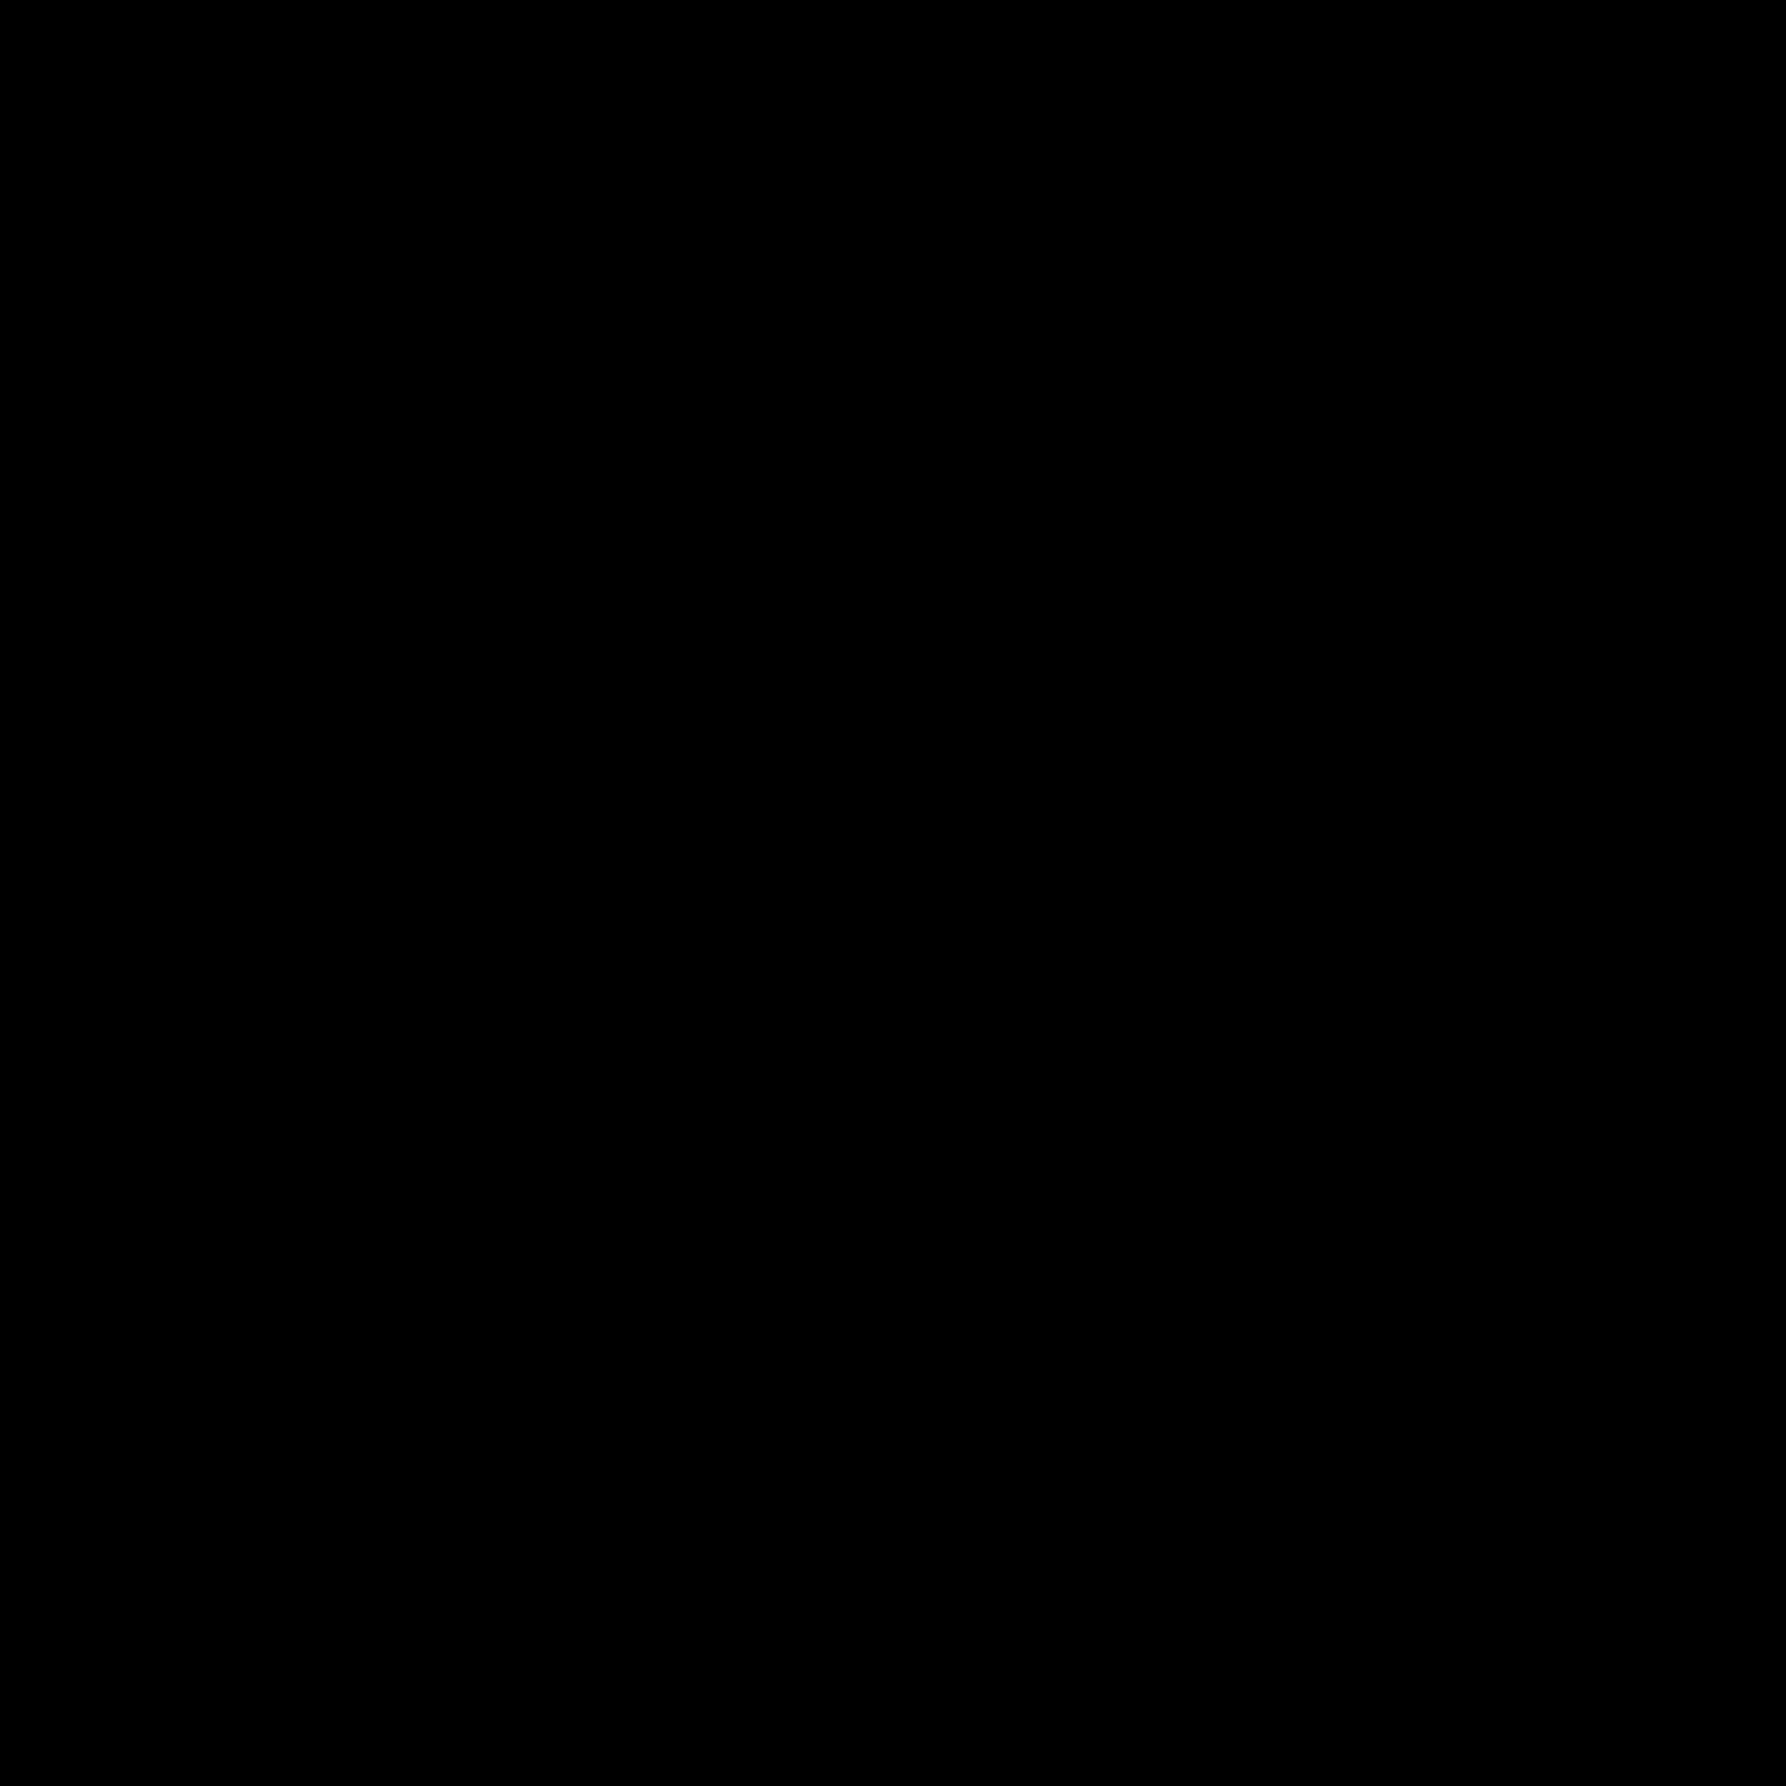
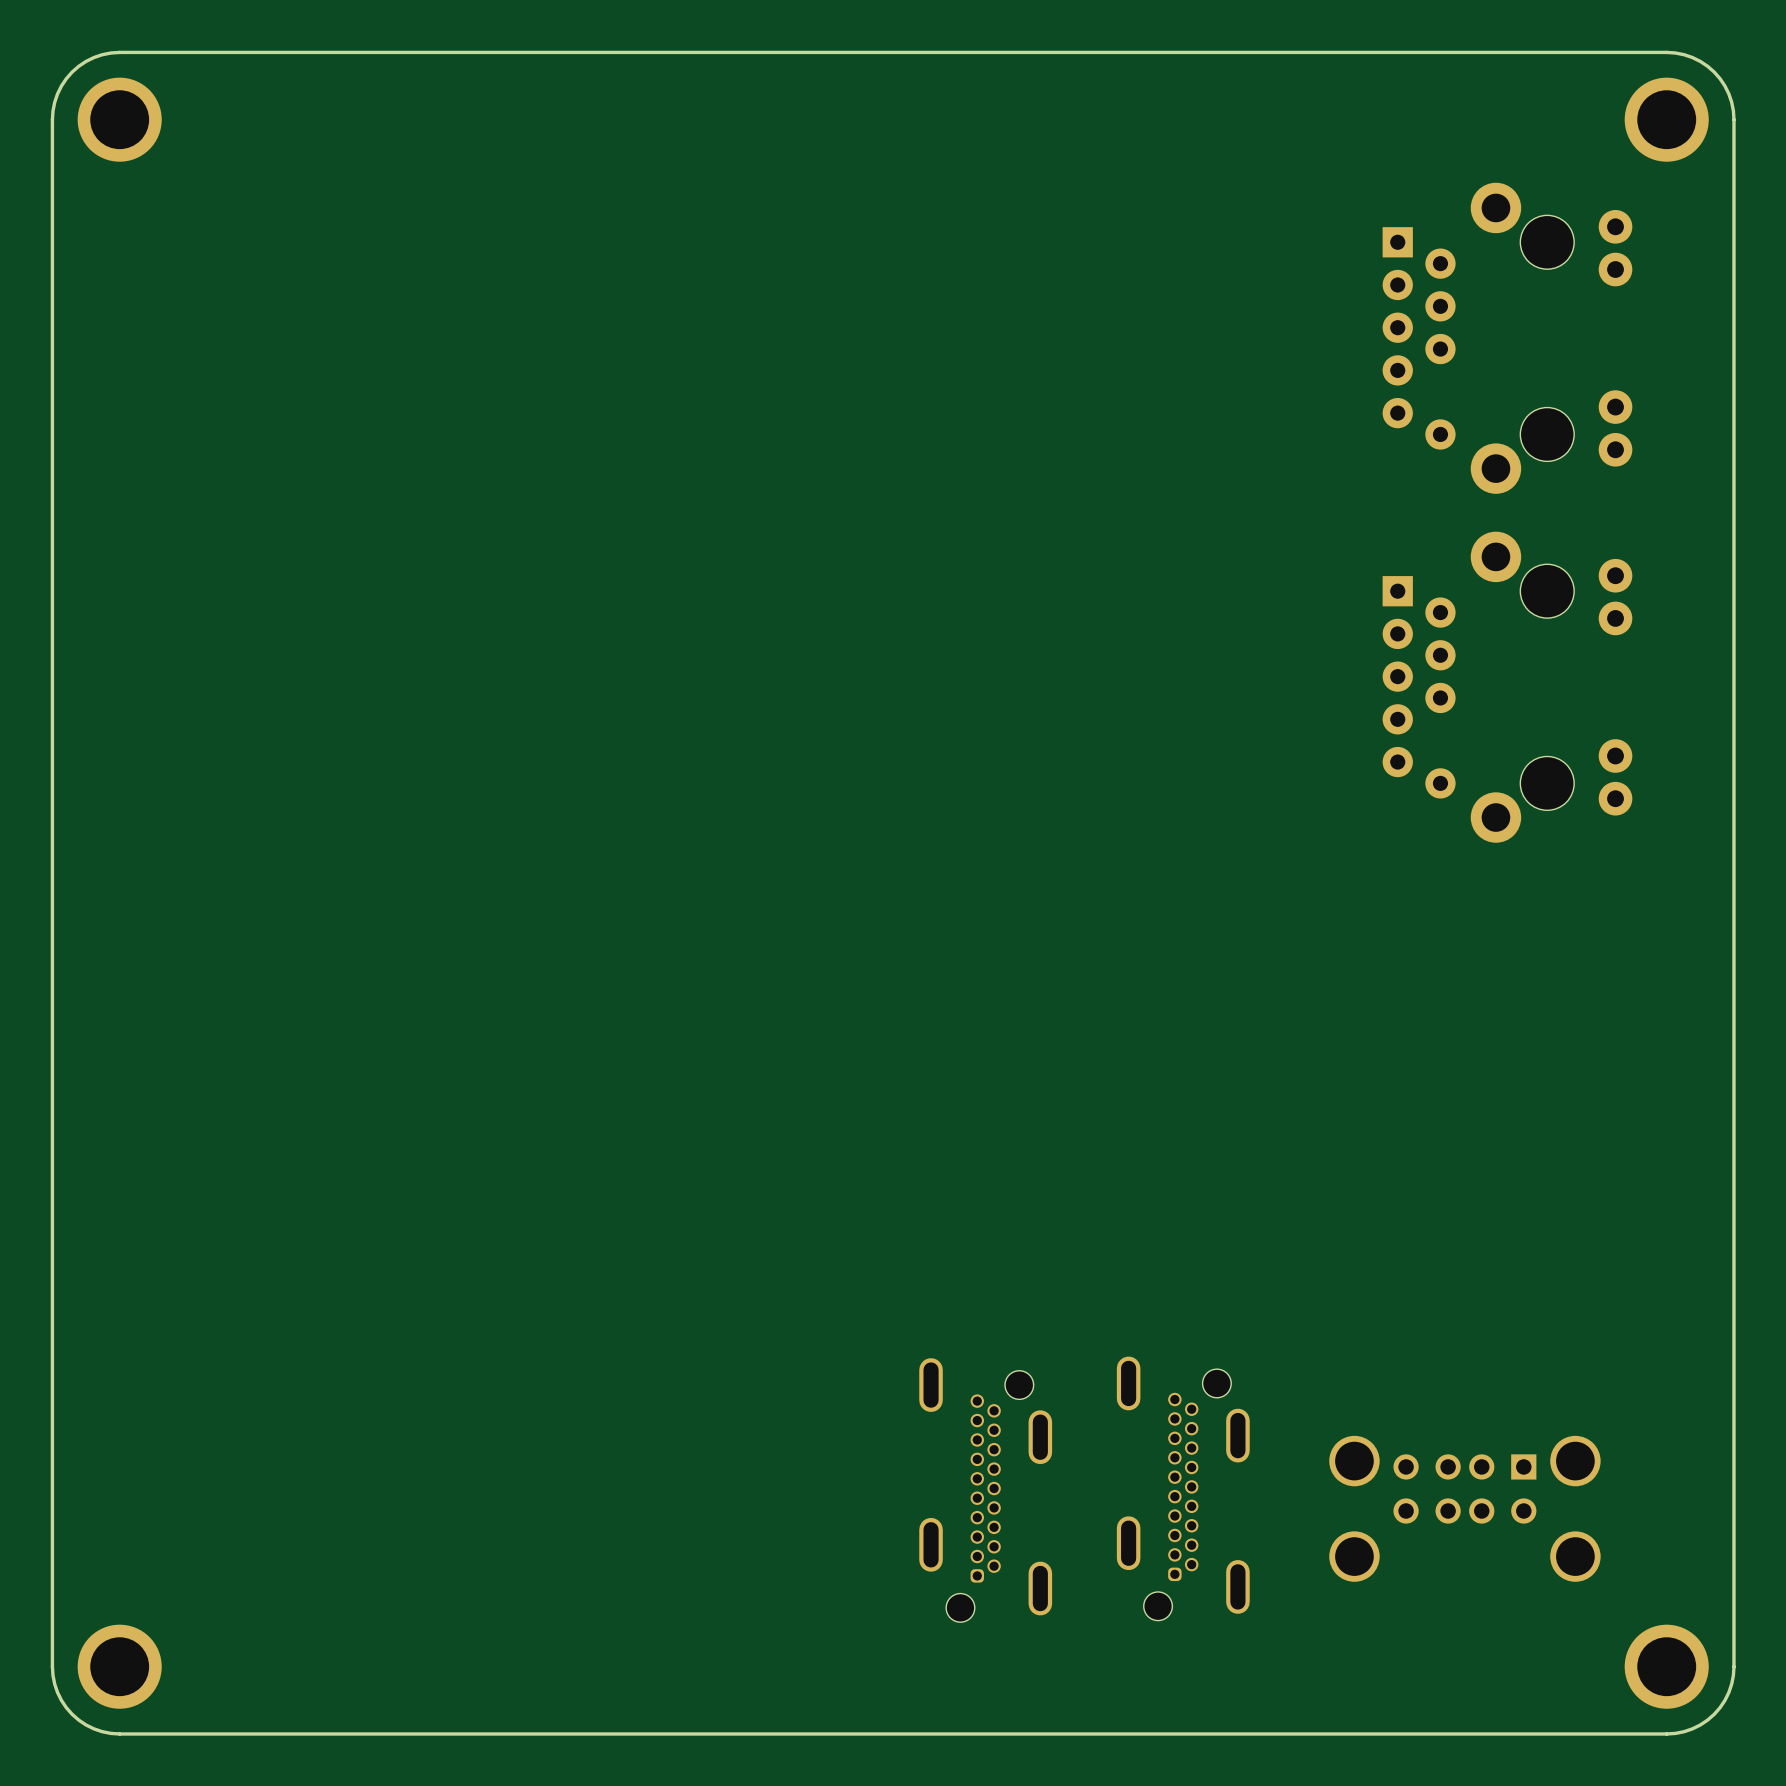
board edge: none -> (1666, 52) (119, 52) (93, 57) (72, 72) (57, 93) (52, 119) (52, 1666) (57, 1692) (72, 1714) (93, 1728) (119, 1733) (1666, 1733) (1692, 1728) (1714, 1714) (1728, 1692) (1733, 1666) (1733, 119) (1728, 93) (1714, 72) (1692, 57) (1666, 52)
part: none -> (119, 119)
part: none -> (1666, 119)
part: none -> (1507, 338)
part: none -> (1507, 687)
part: none -> (1183, 1488)
part: none -> (985, 1490)
part: none -> (1464, 1508)
part: none -> (119, 1666)
part: none -> (1666, 1666)

